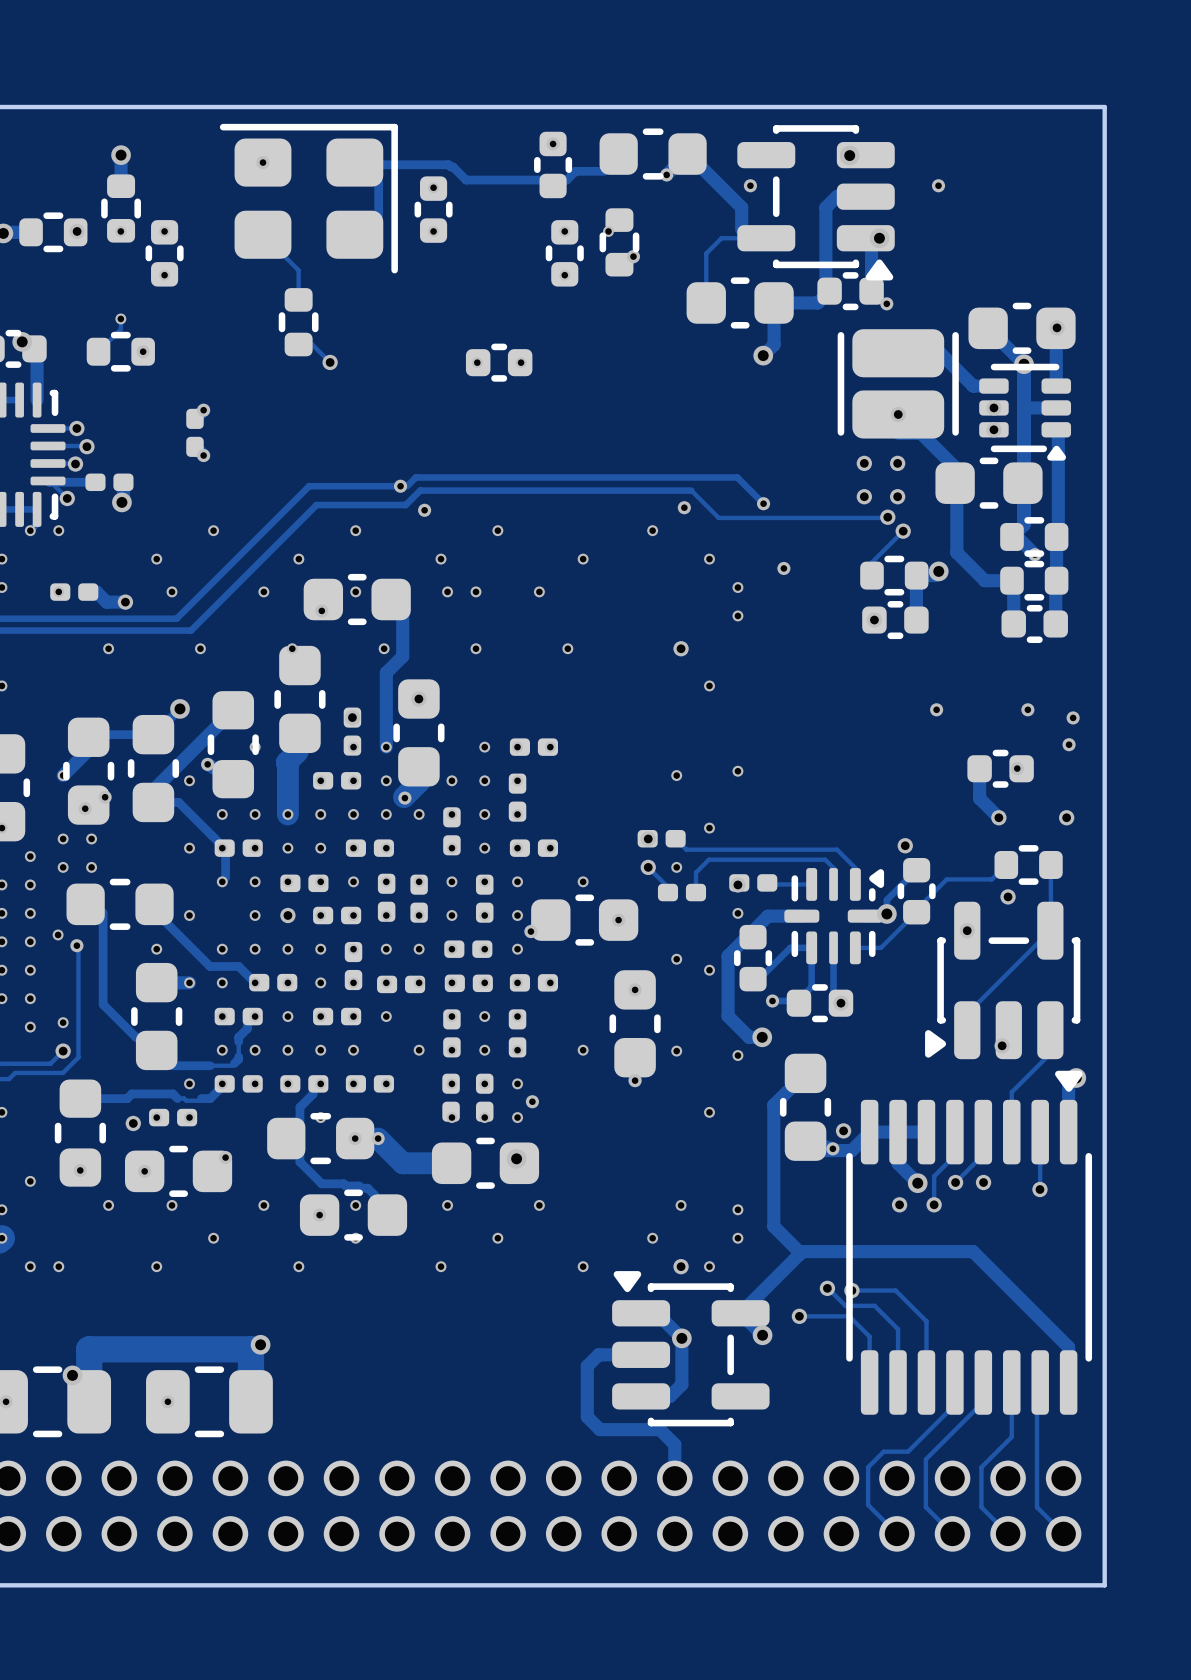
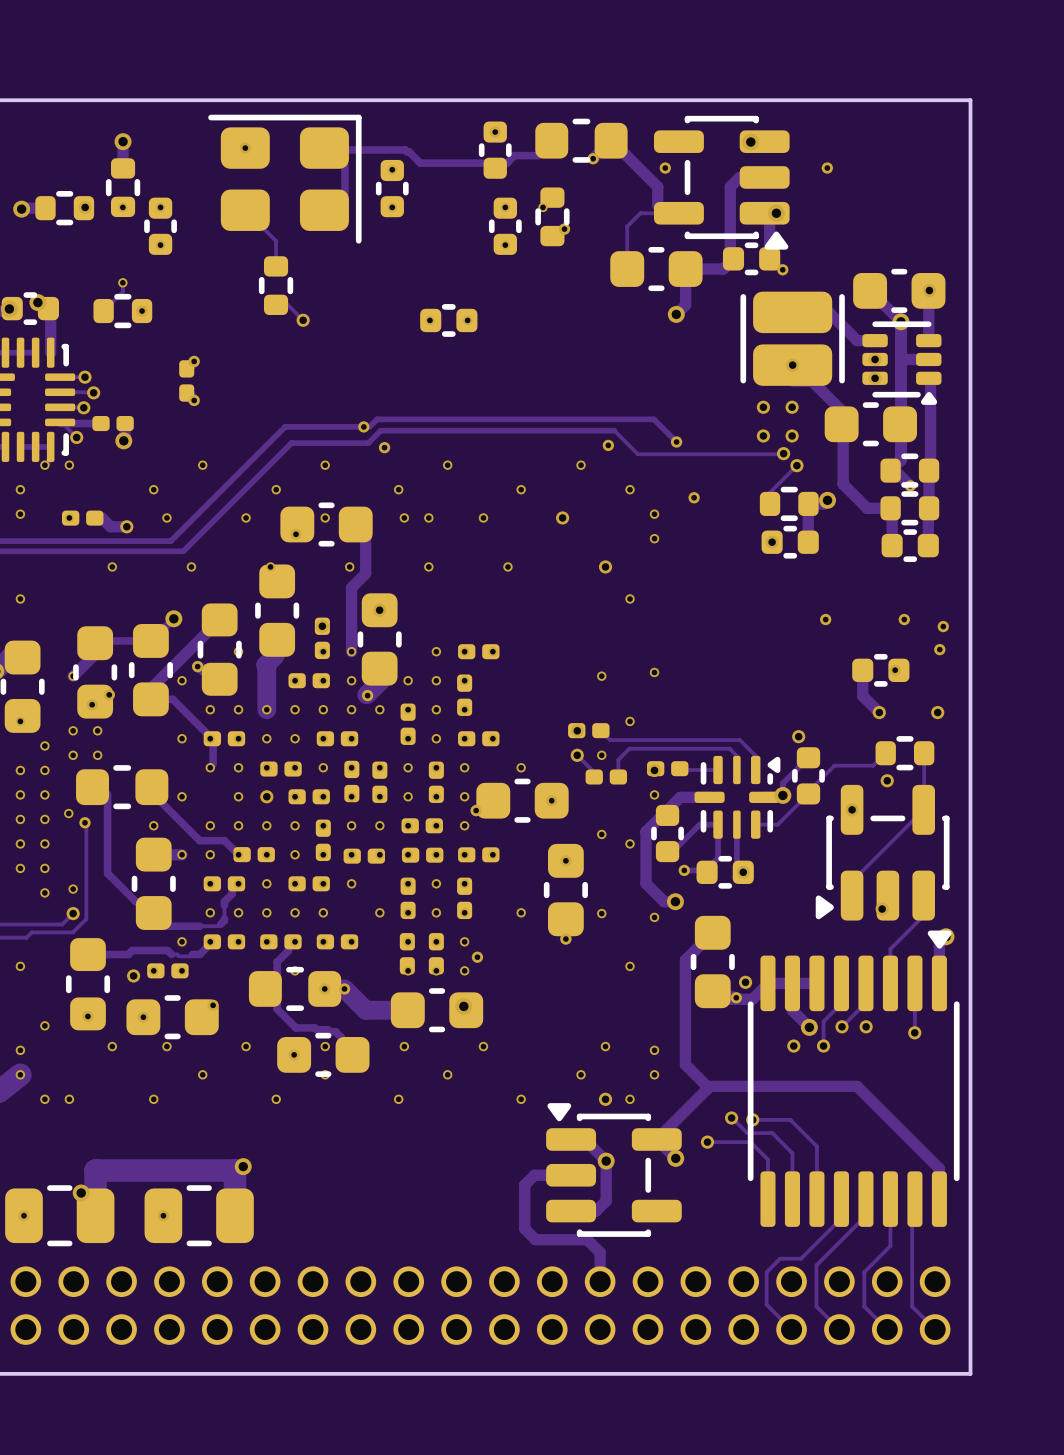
via: none -> (562, 517)

